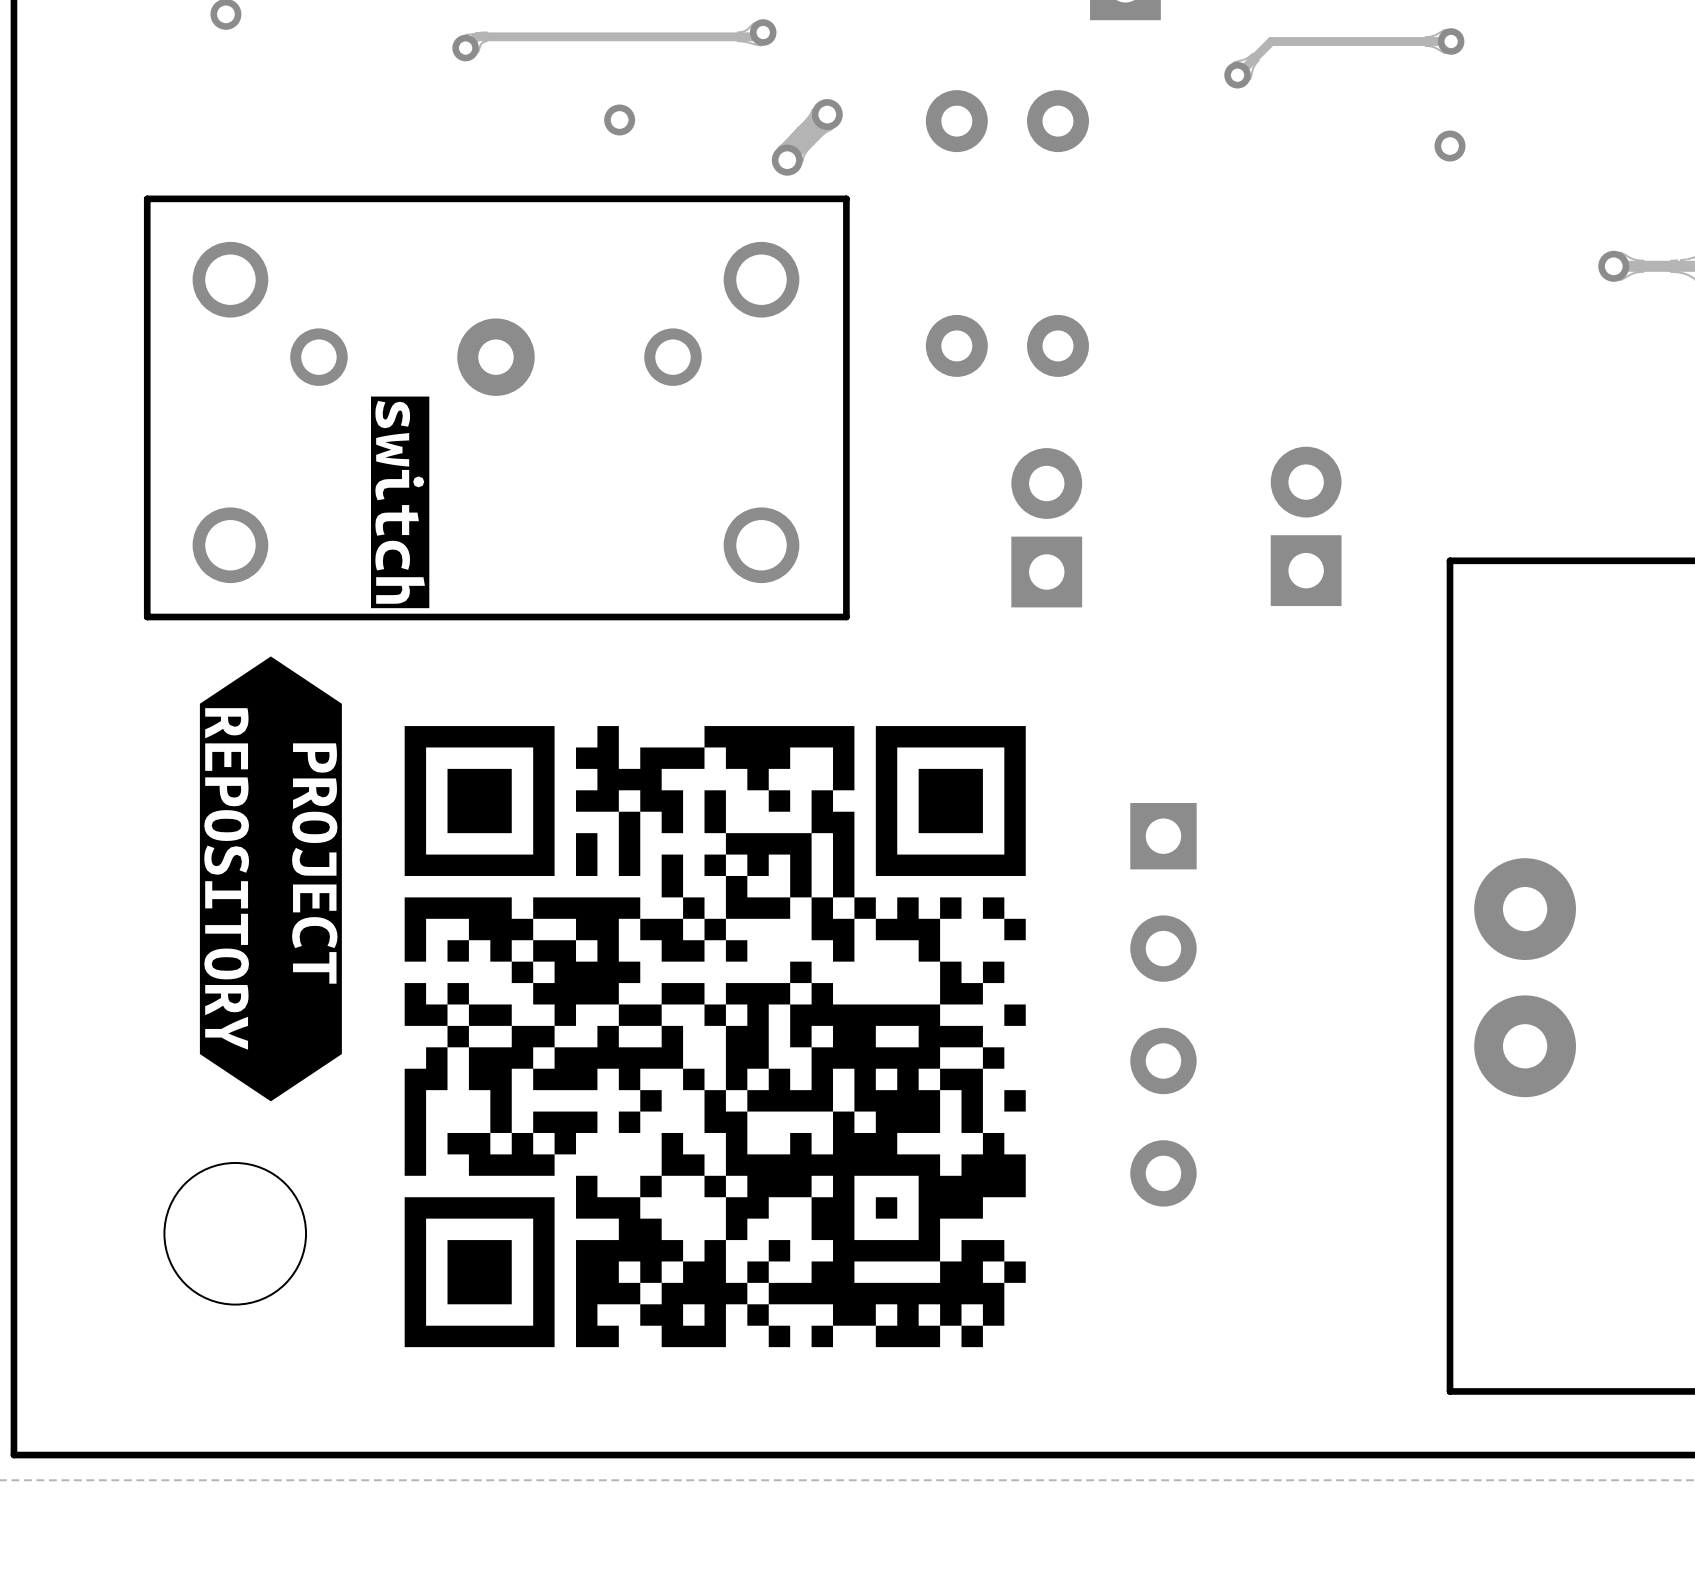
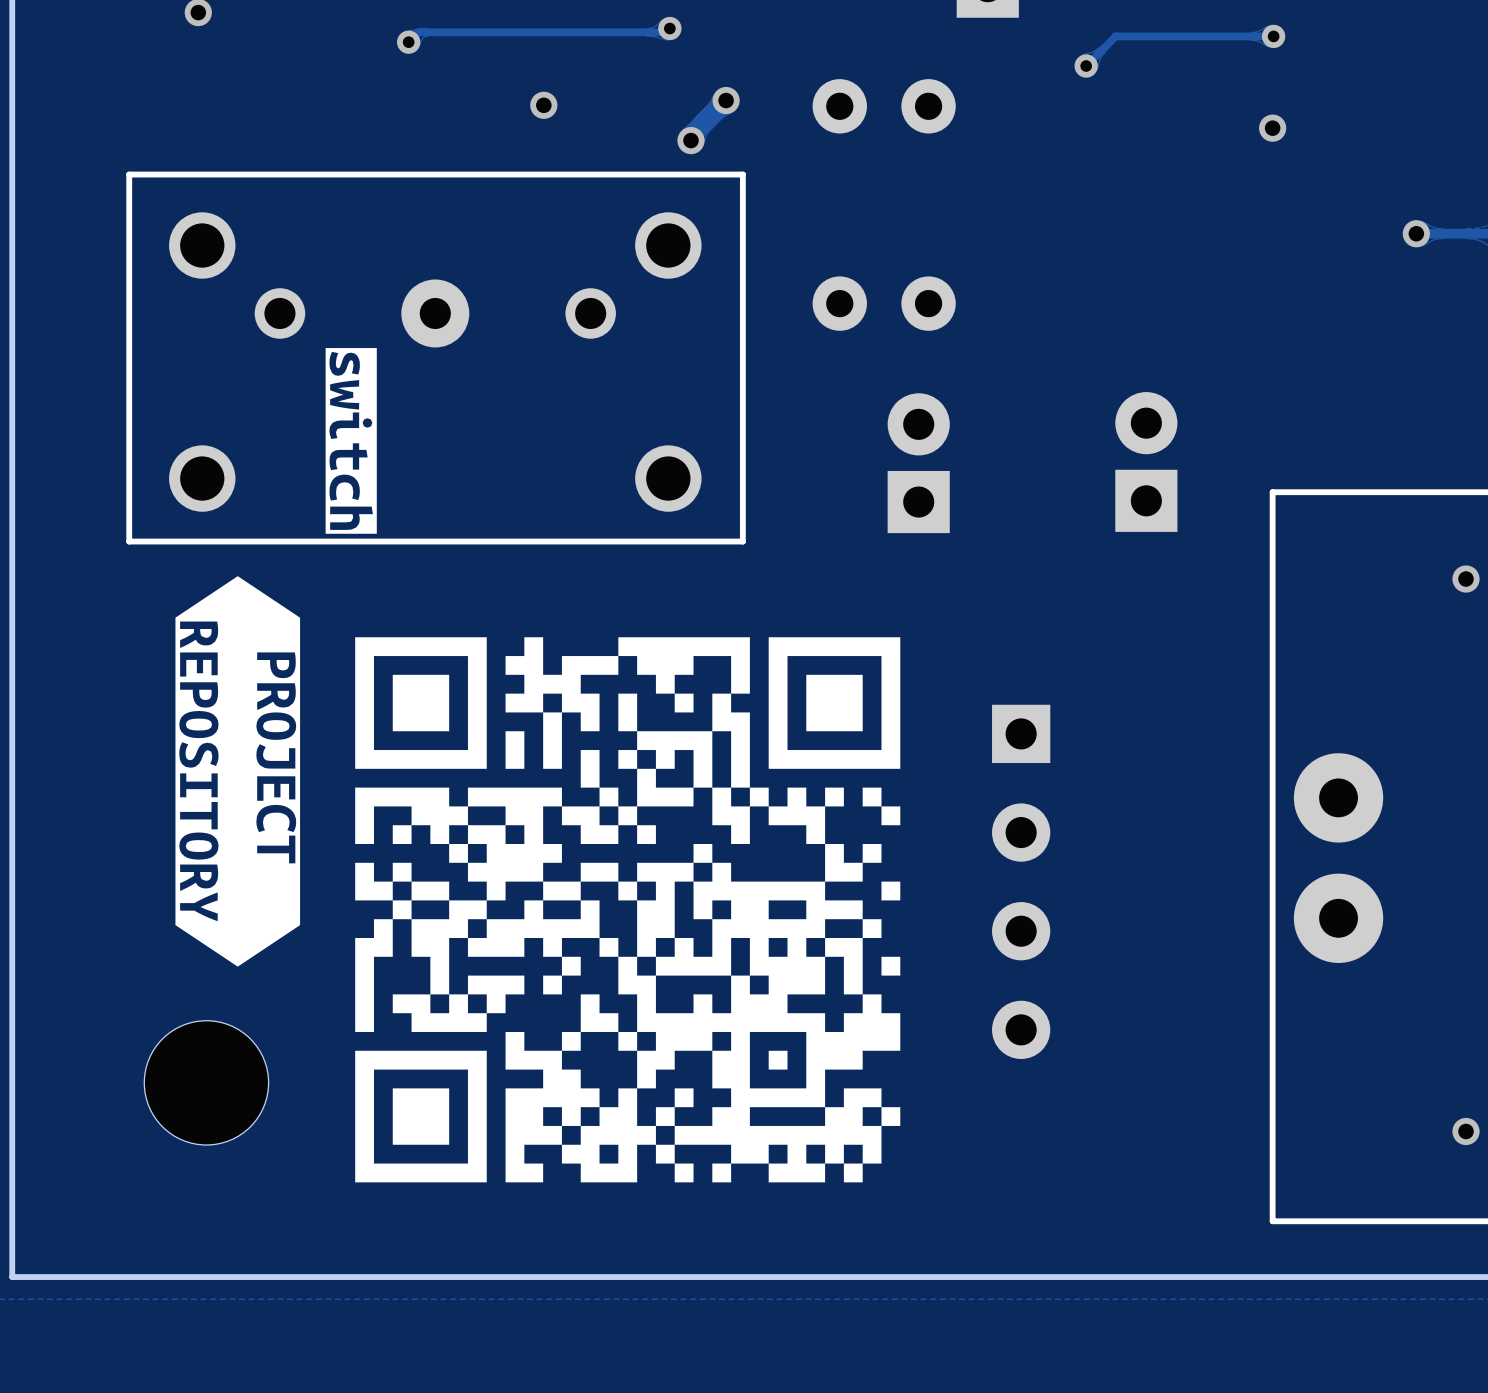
via: none -> (1466, 579)
via: none -> (1466, 1131)

